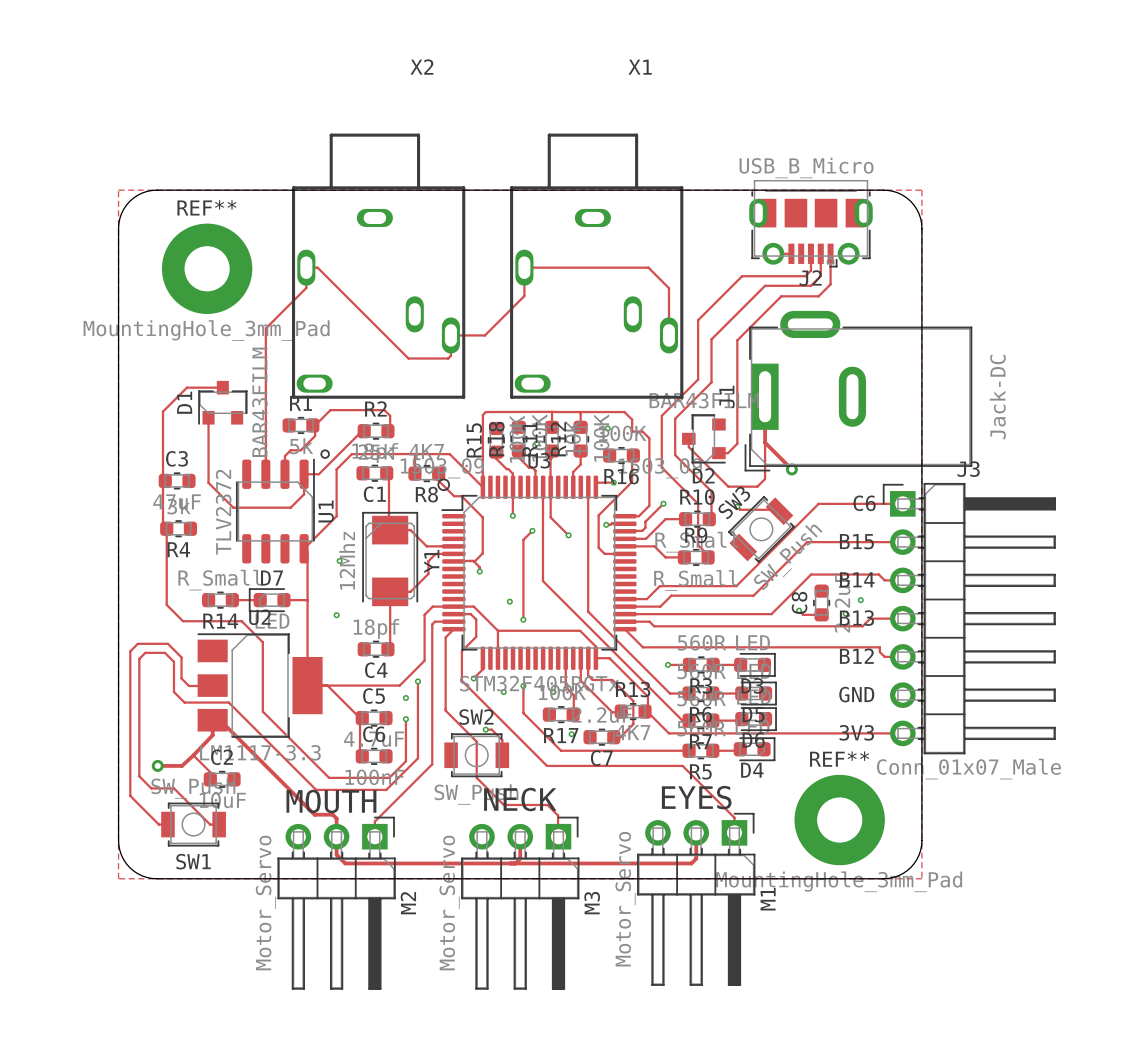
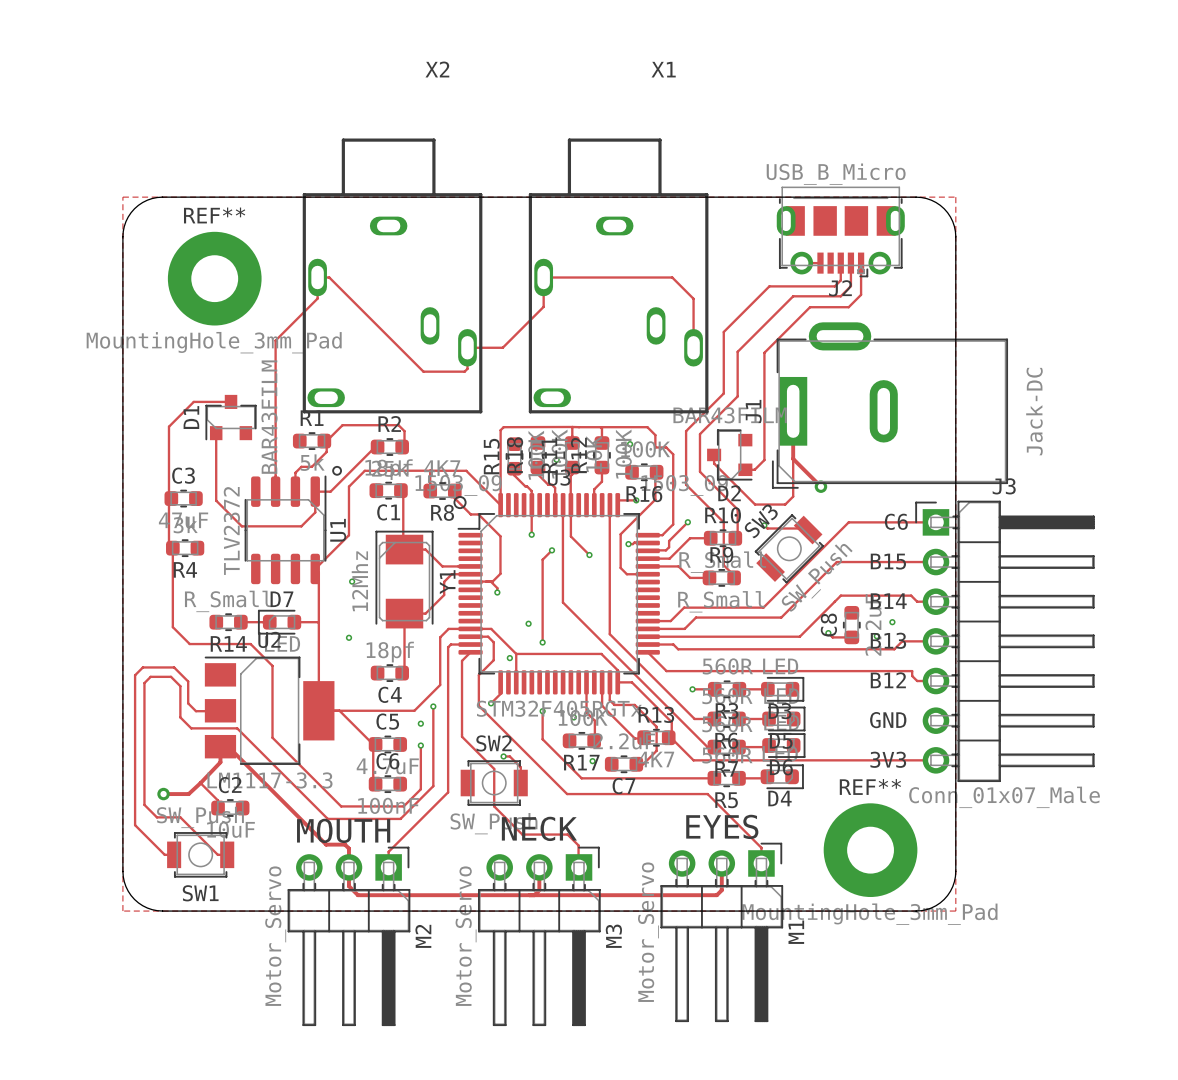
via position: (503, 692) -> (509, 658)

